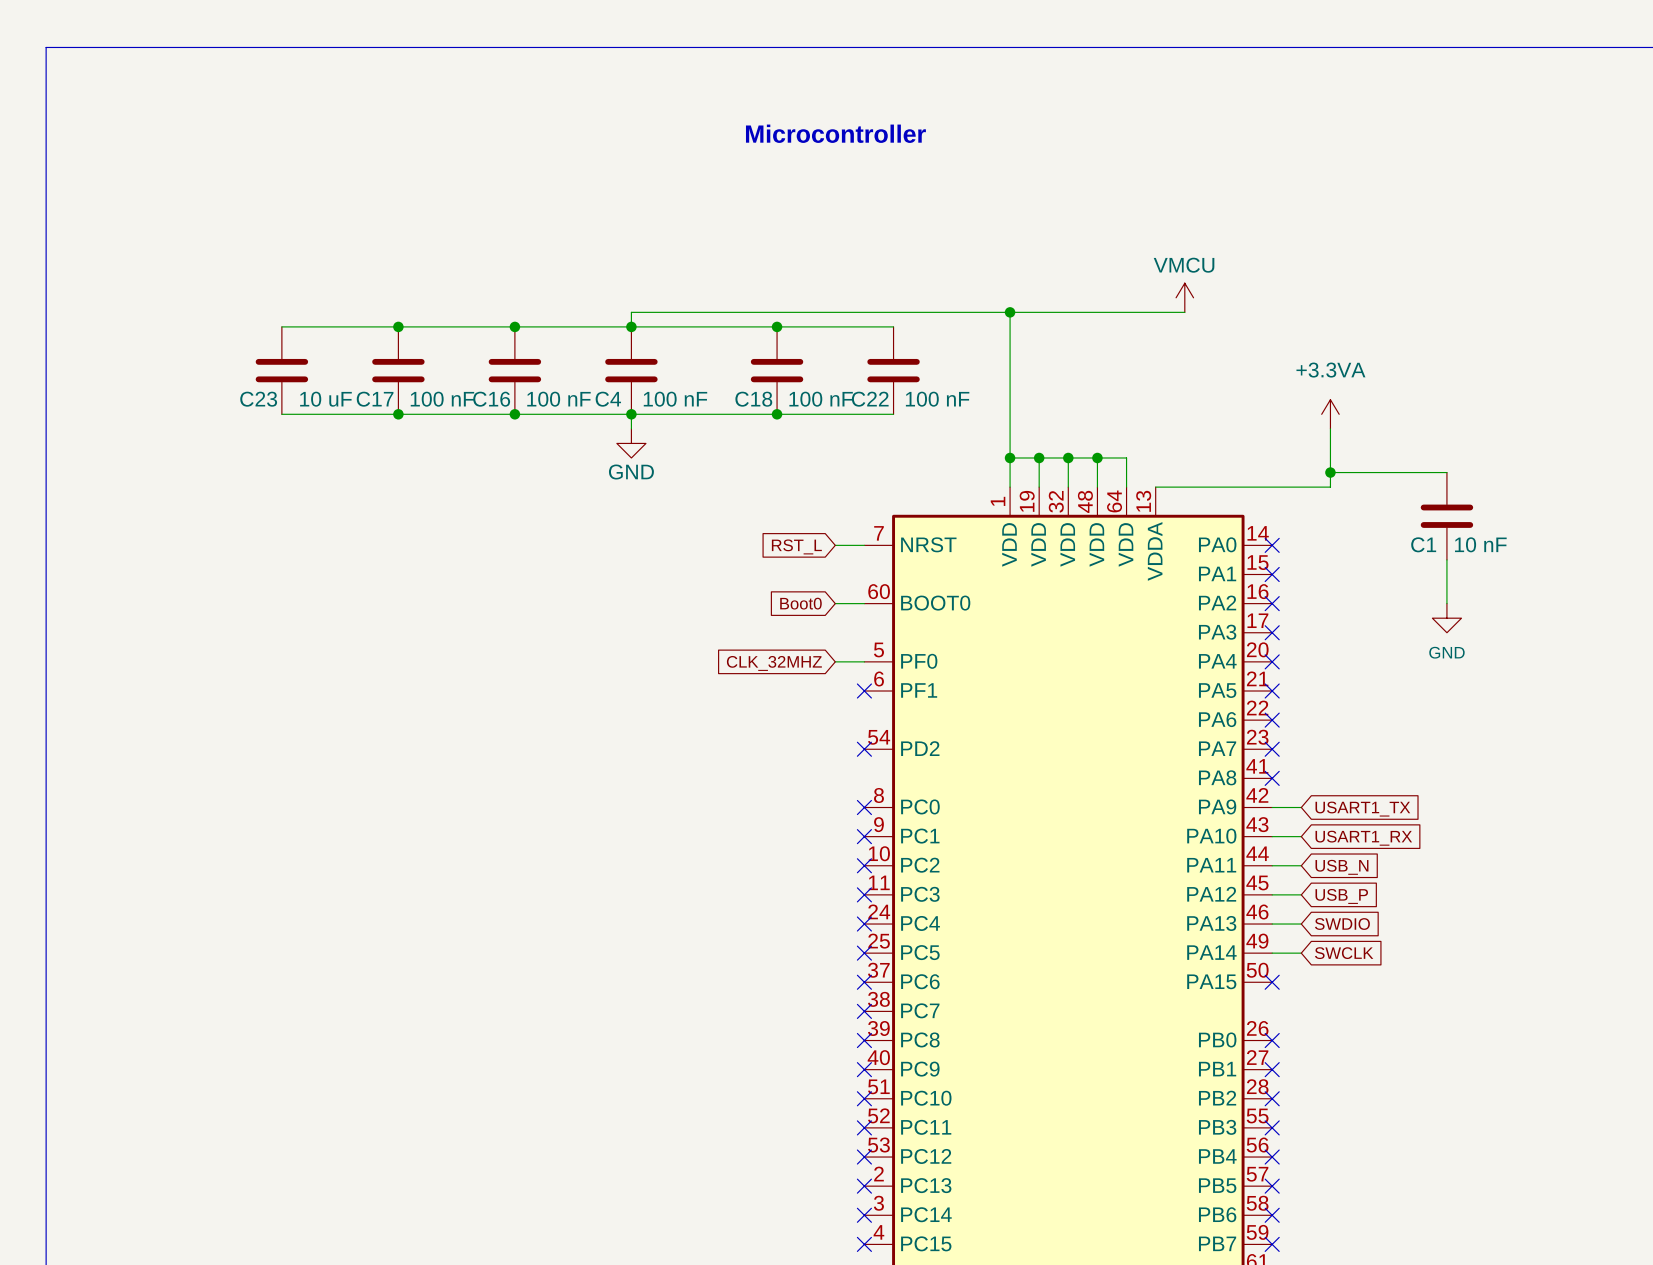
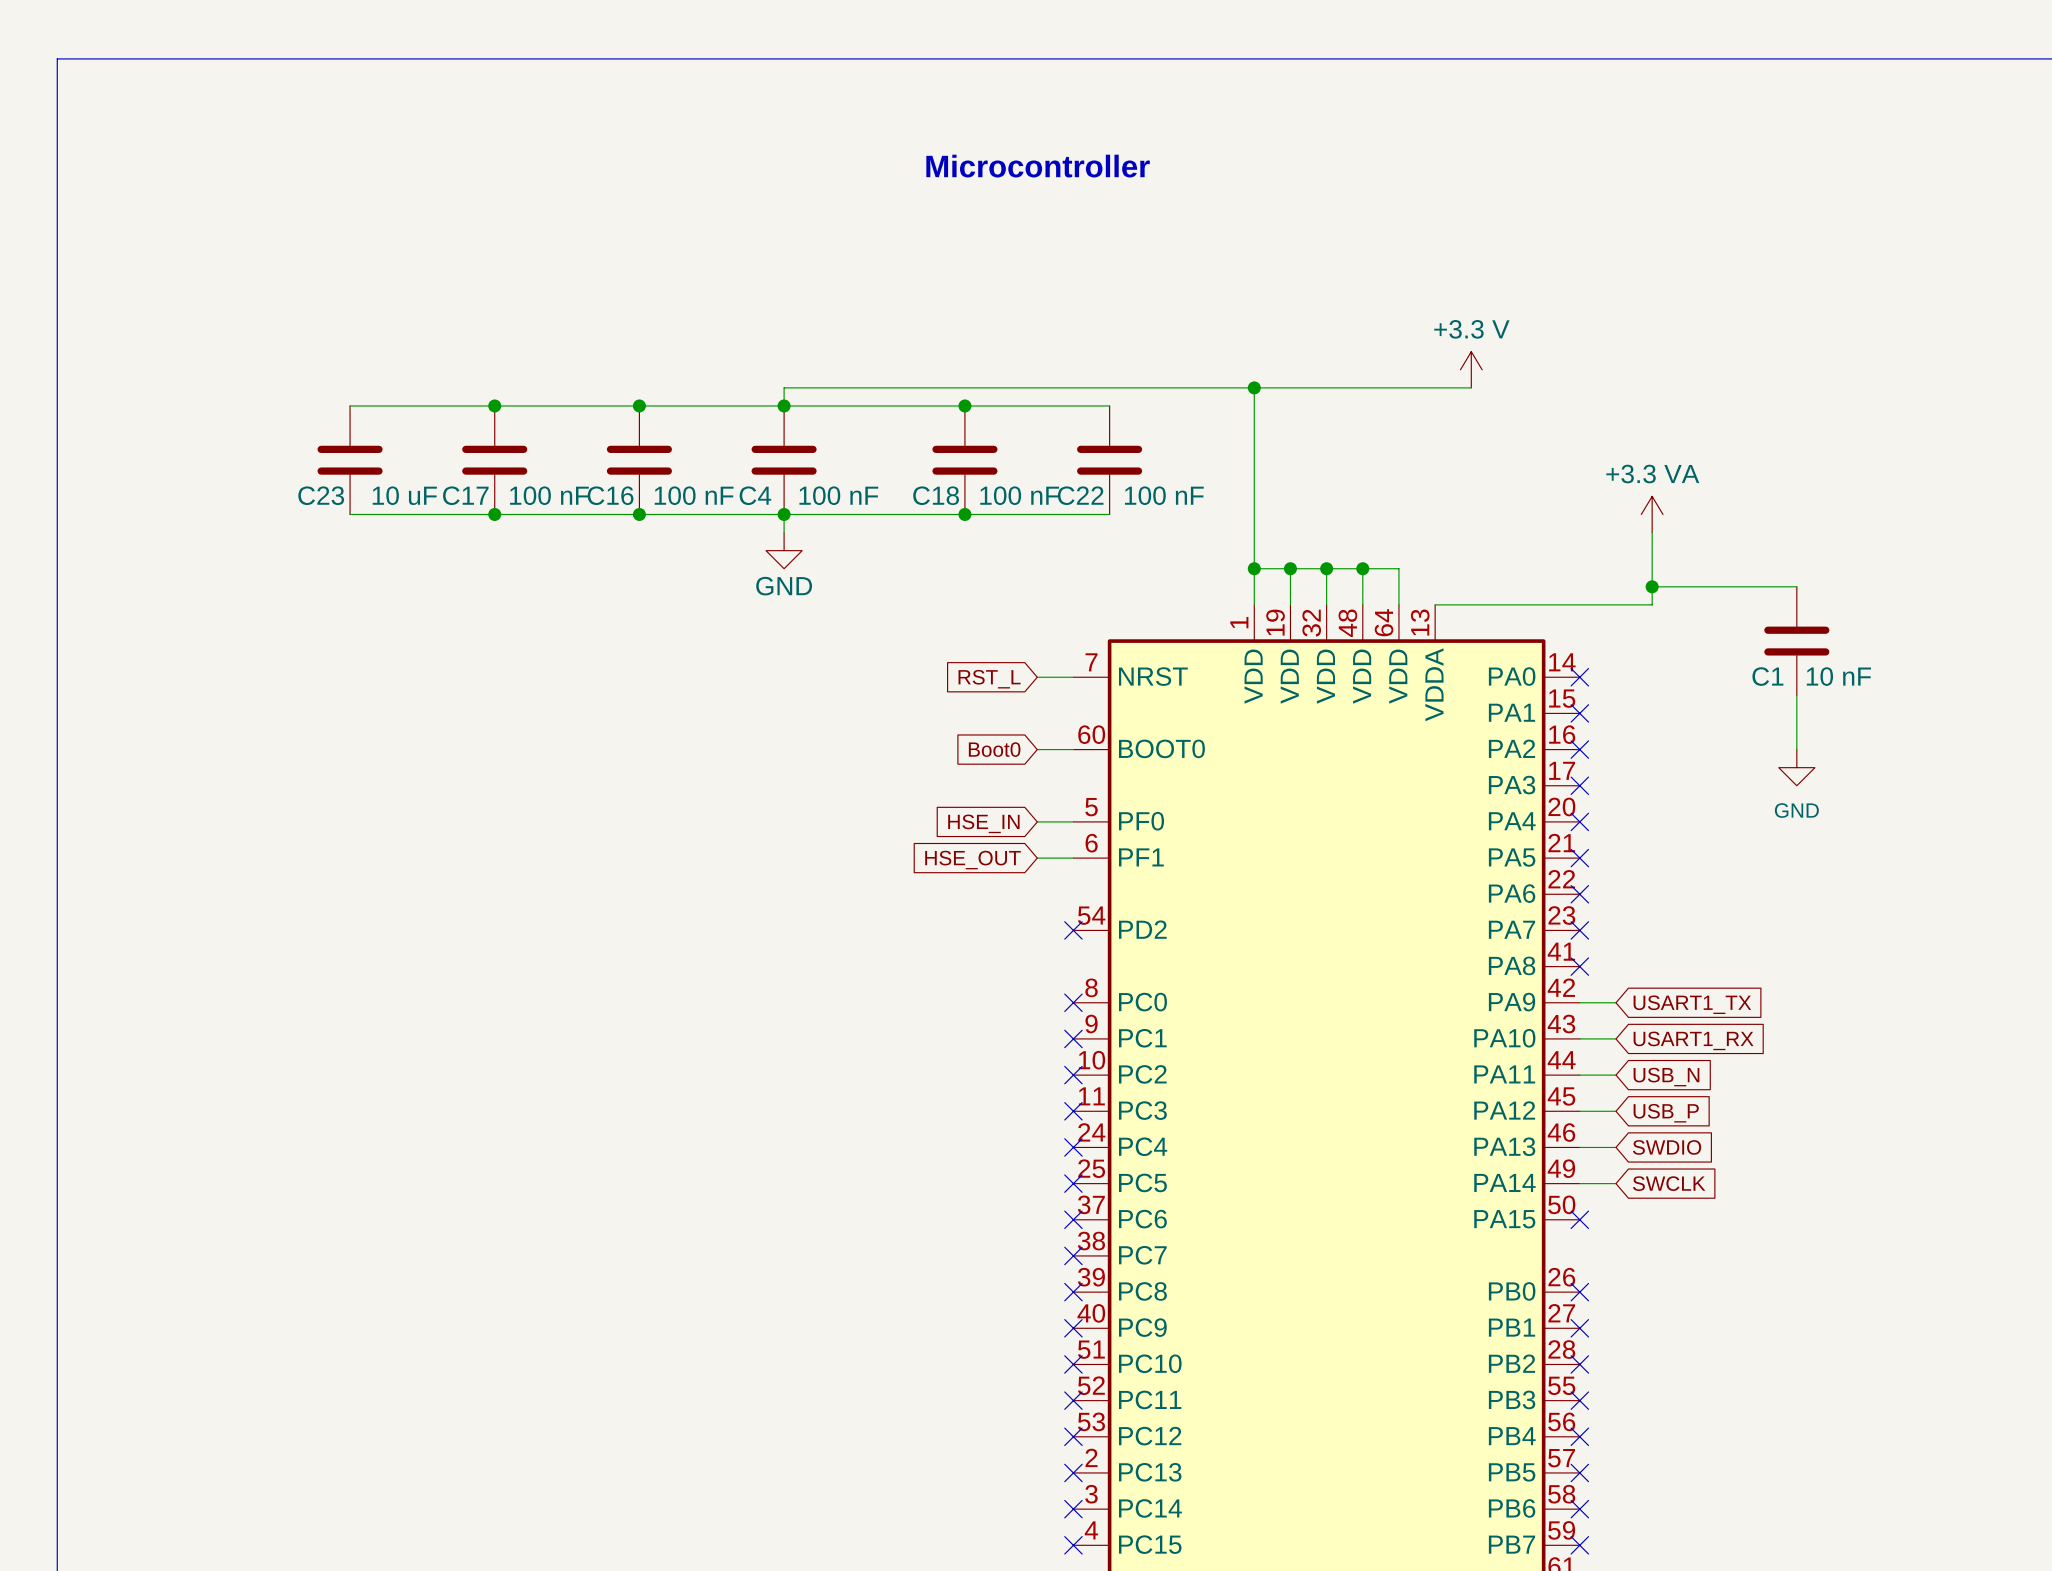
power symbol: VMCU (1184, 297) -> +3.3 V (1471, 369)
power symbol: +3.3VA (1330, 414) -> +3.3 VA (1652, 514)
global label: CLK_32MHZ (774, 663) -> HSE_IN (983, 823)
wire: none -> (1037, 858) (1073, 858)
no-connect mark: (864, 691) -> none
global label: none -> HSE_OUT (972, 860)

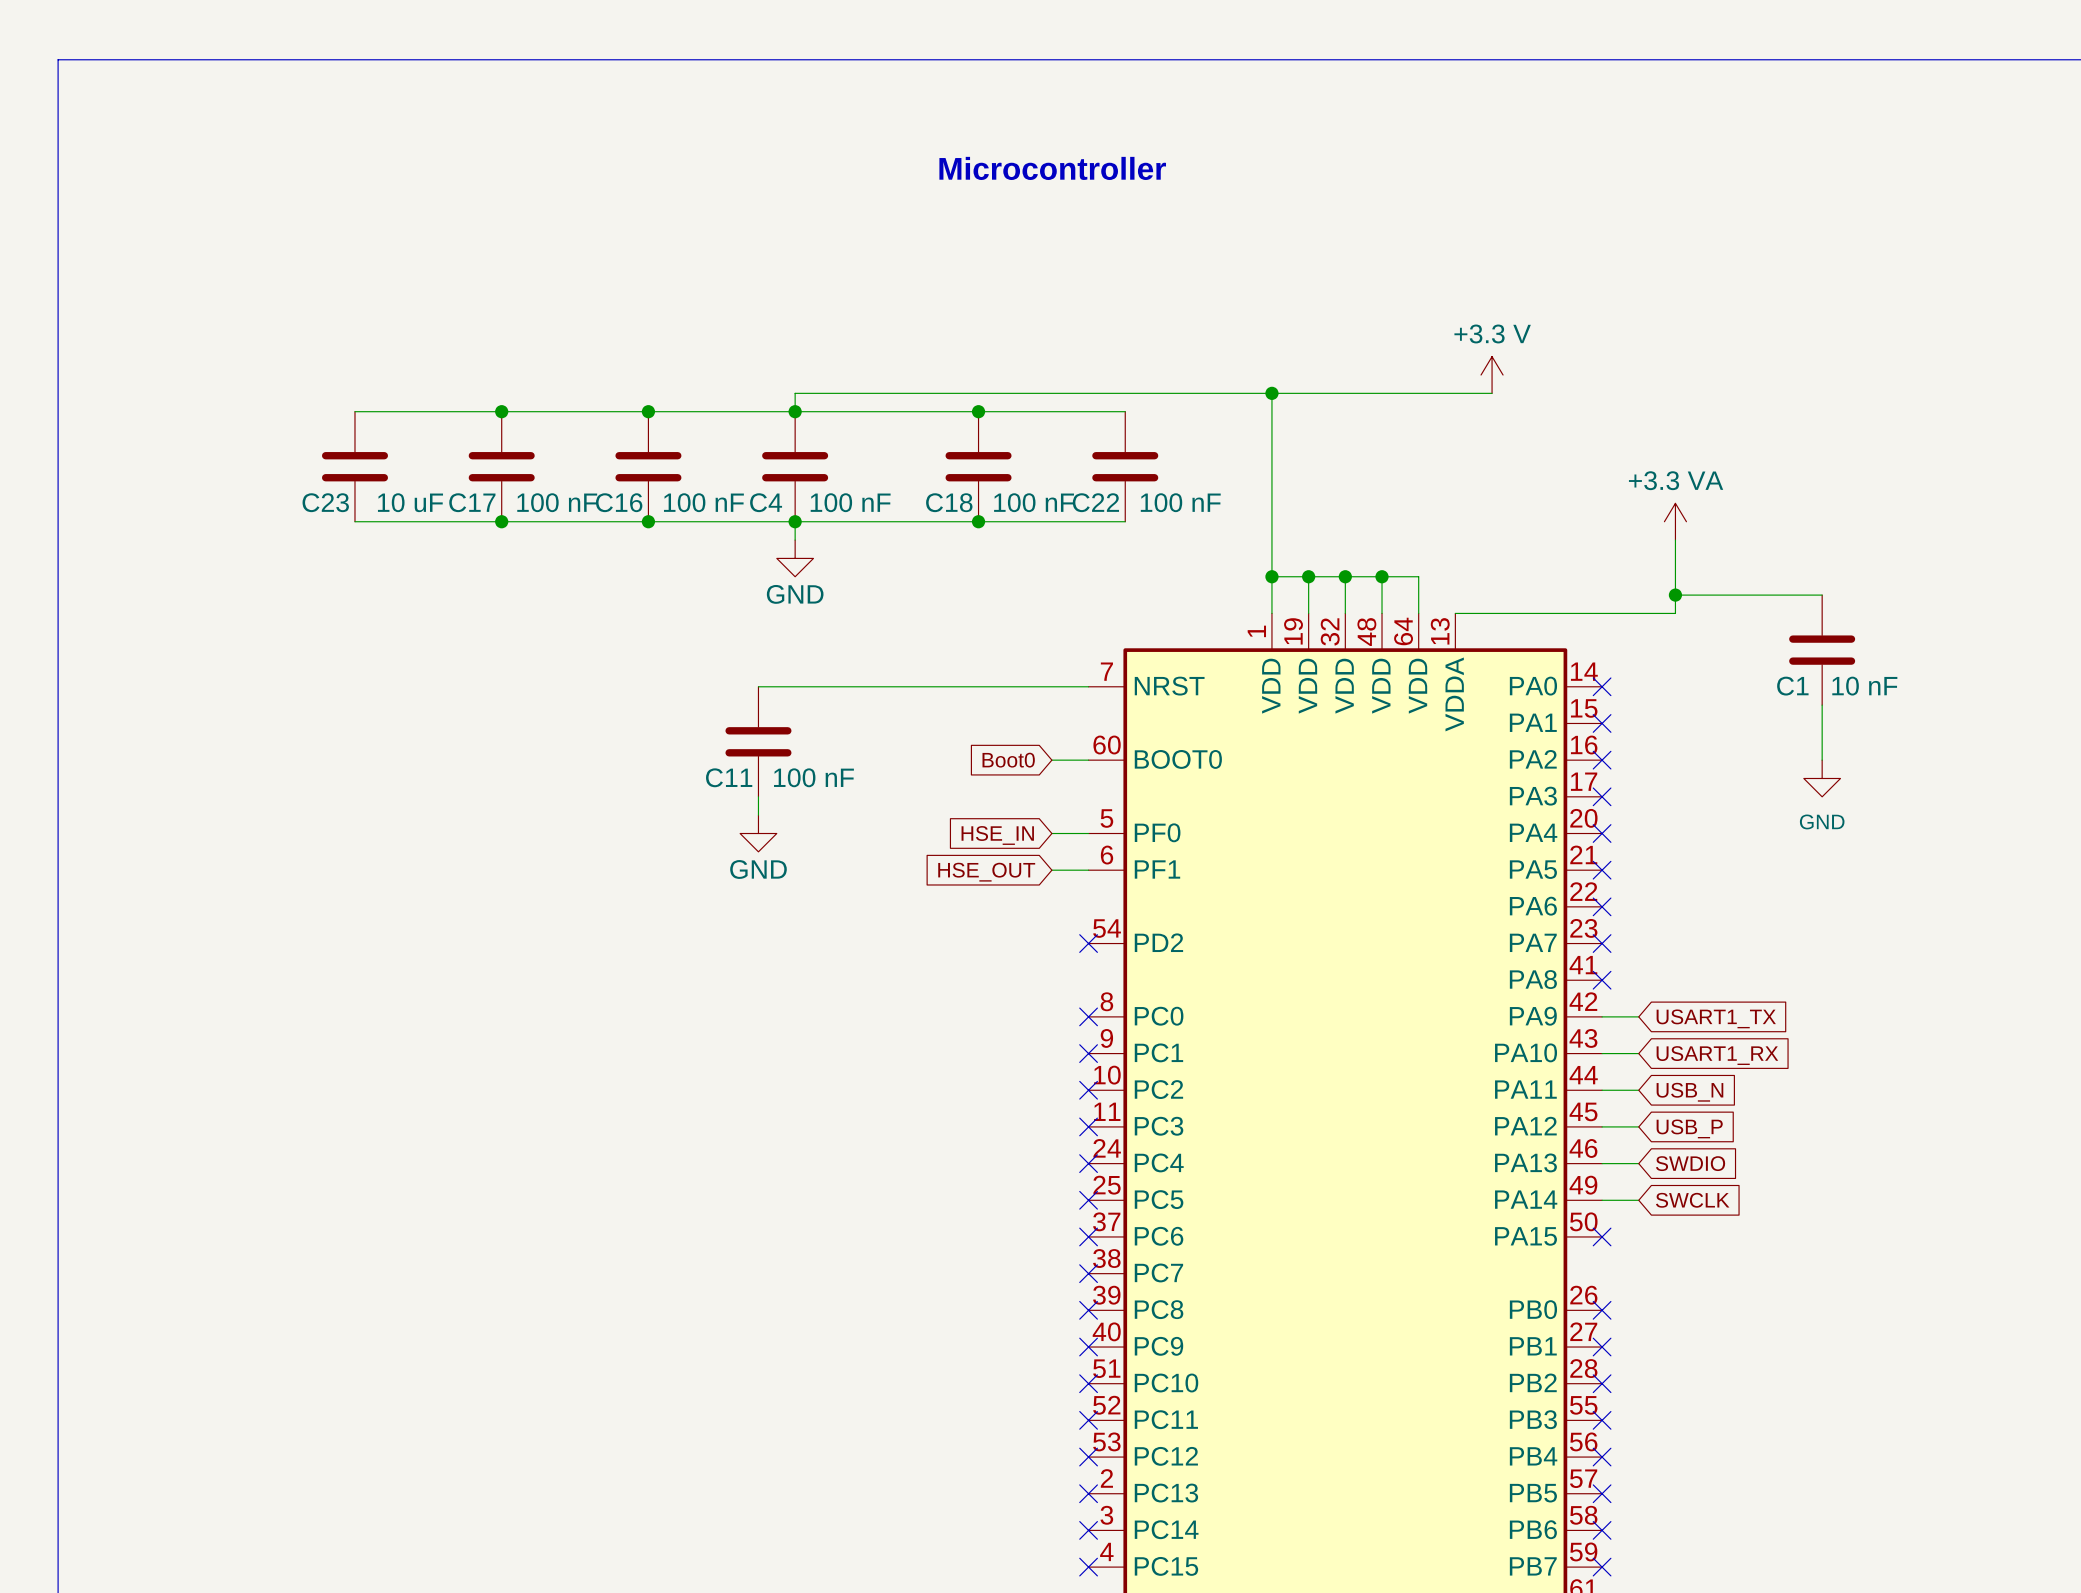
wire: none -> (758, 686) (1051, 686)
global label: RST_L (989, 679) -> none
C11: none -> 100 nF (758, 741)
wire: none -> (758, 796) (758, 815)
power symbol: none -> GND (758, 833)

